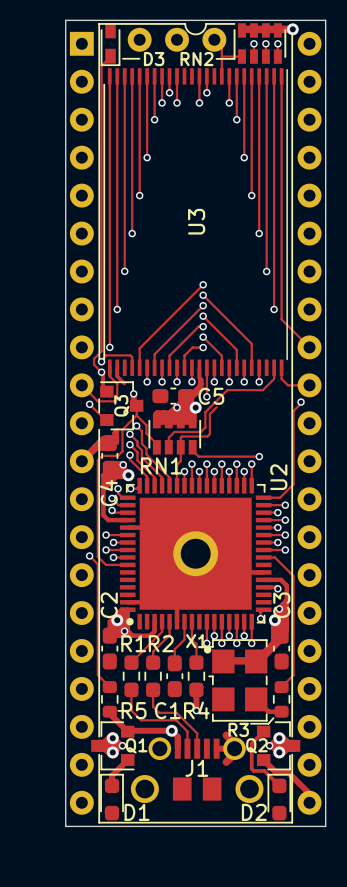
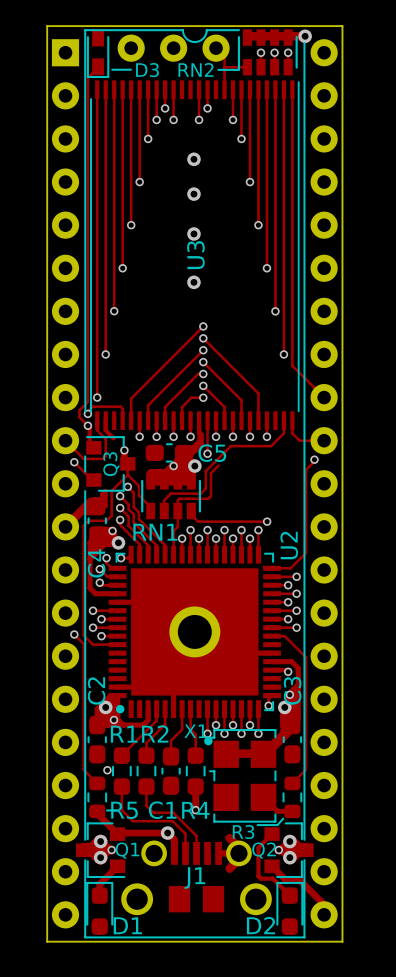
via: none -> (193, 159)
via: none -> (193, 194)
via: none -> (193, 233)
via: none -> (193, 282)
via: none -> (107, 770)

